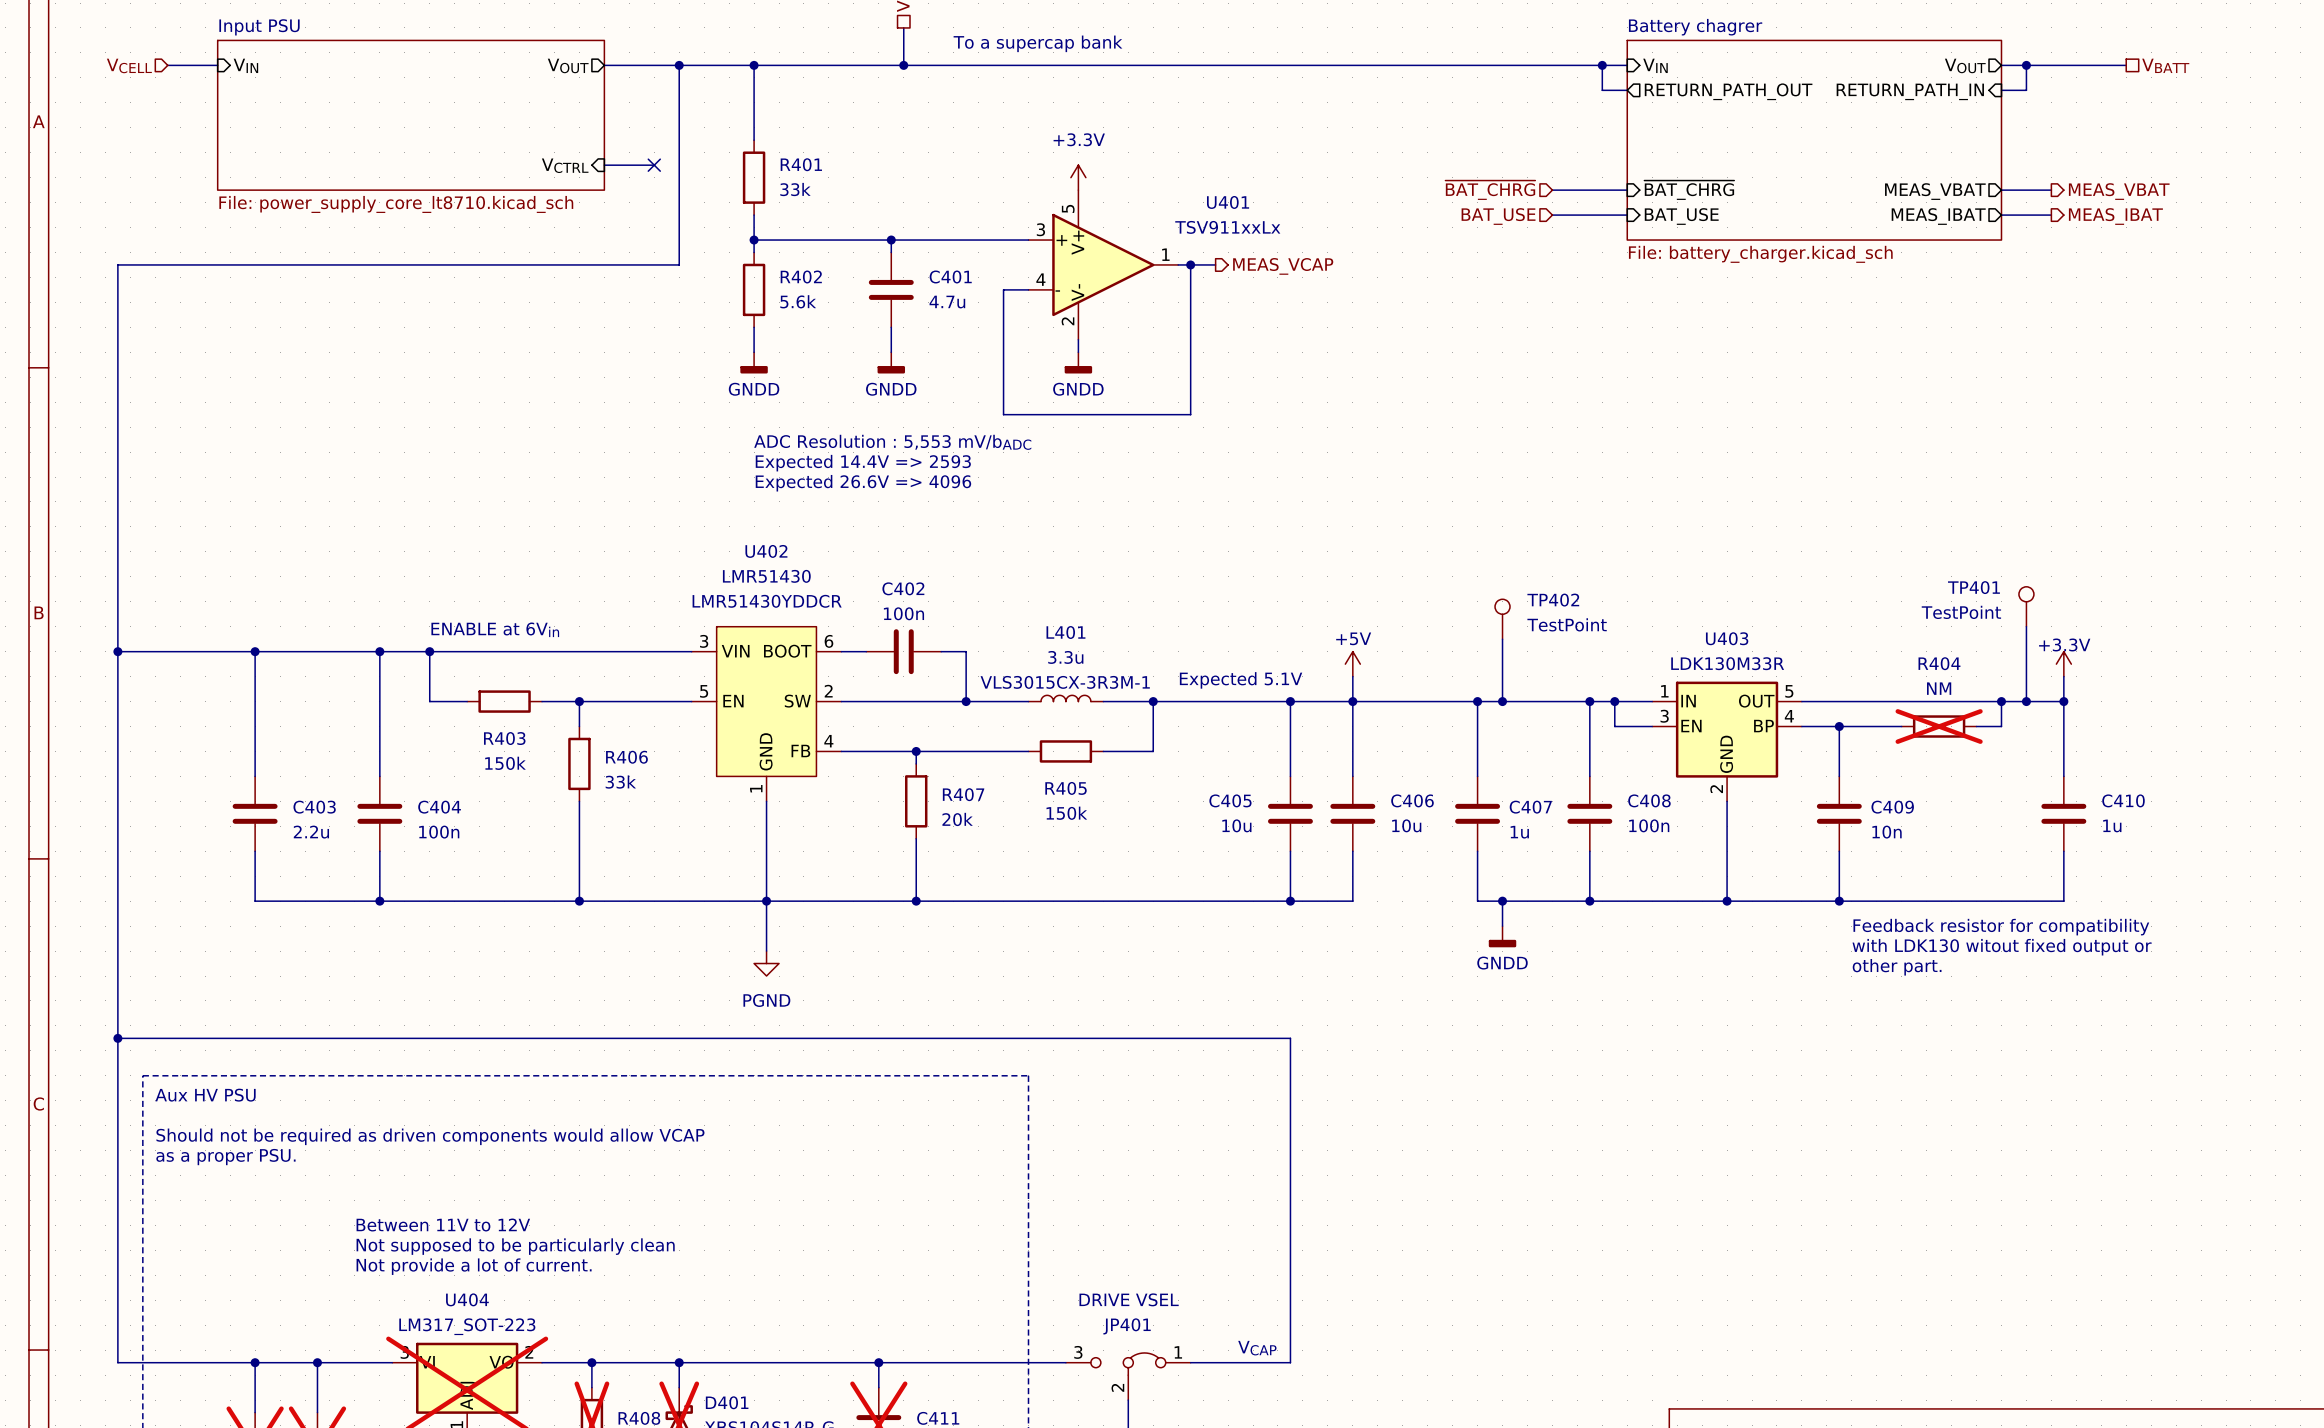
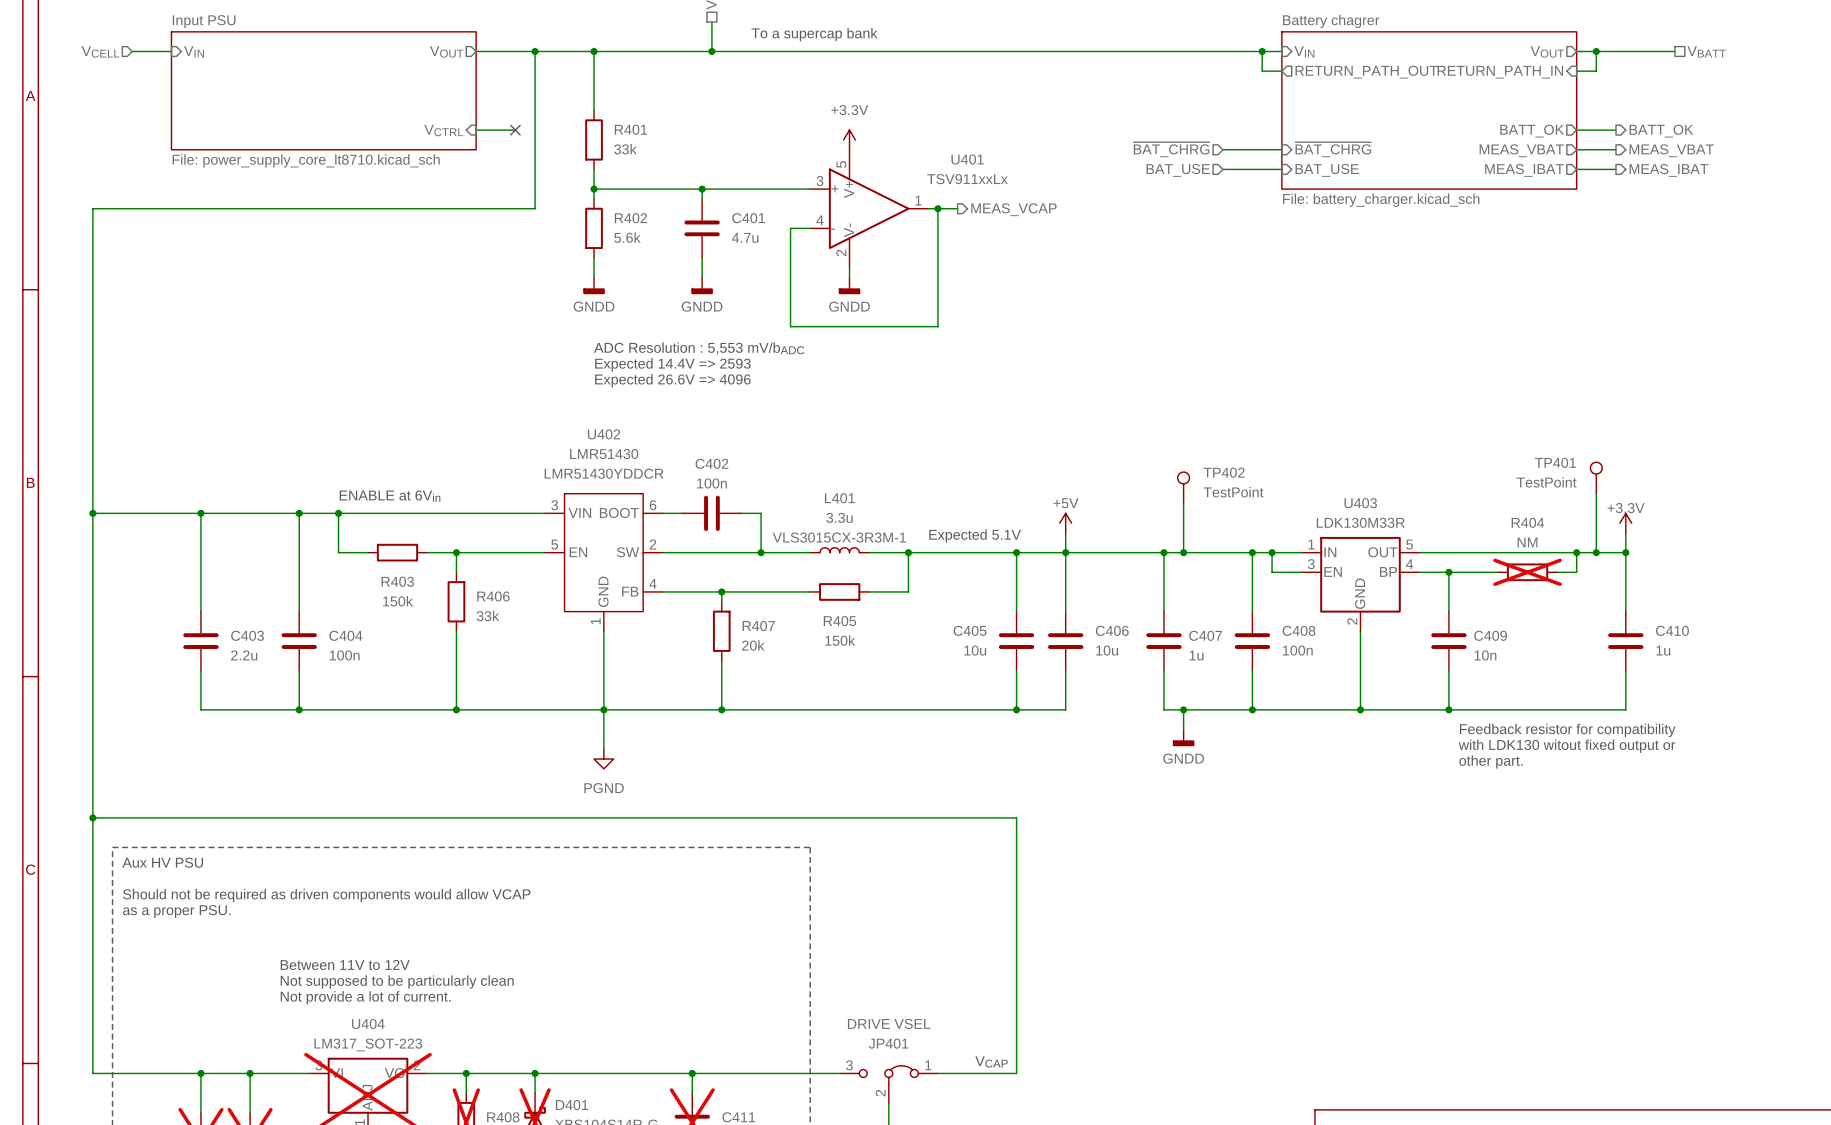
wire: none -> (1576, 130) (1615, 130)
sheet pin: none -> BATT_OK (1532, 131)
hierarchical label: none -> BATT_OK (1661, 131)

